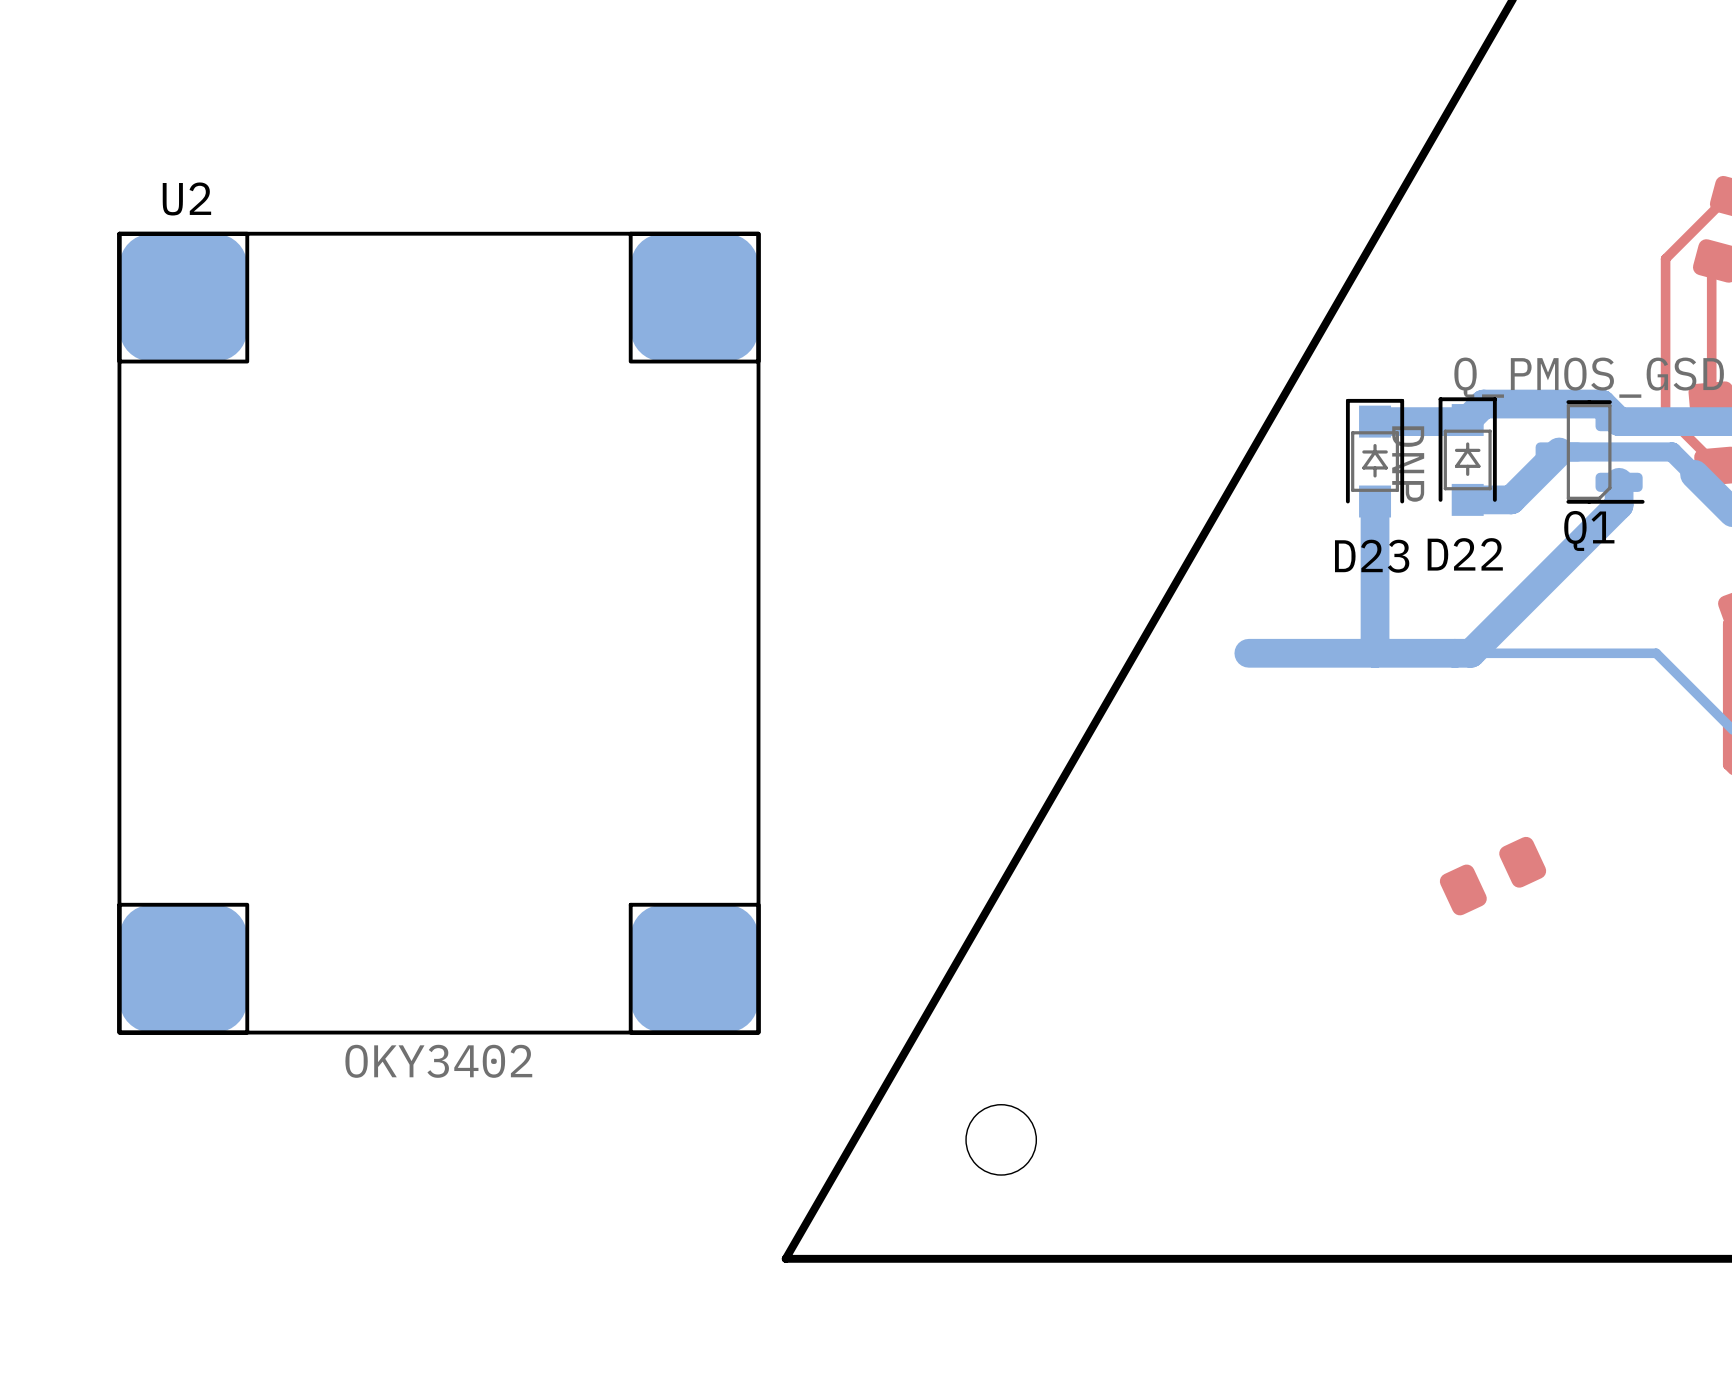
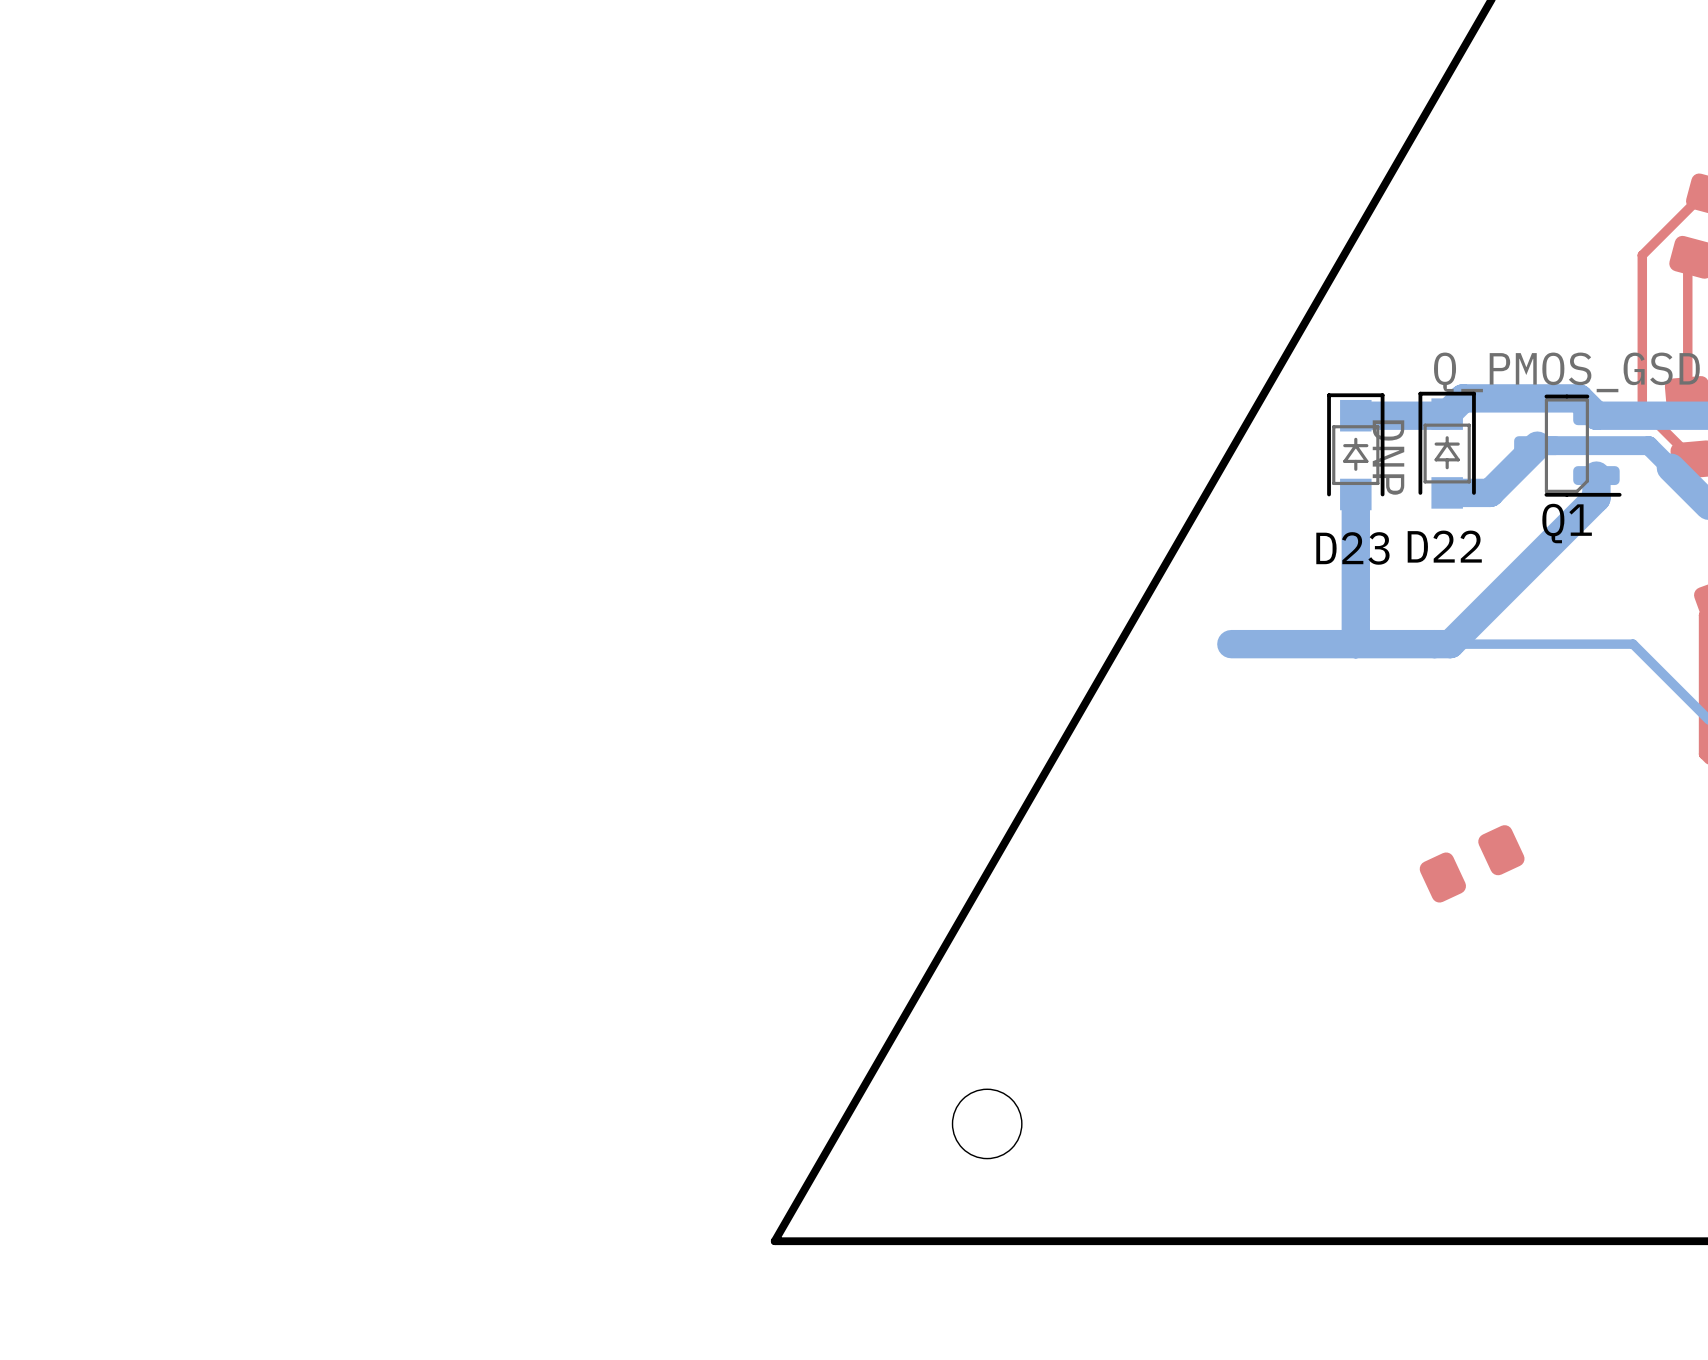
U2: OKY3402 (438, 633) -> none

